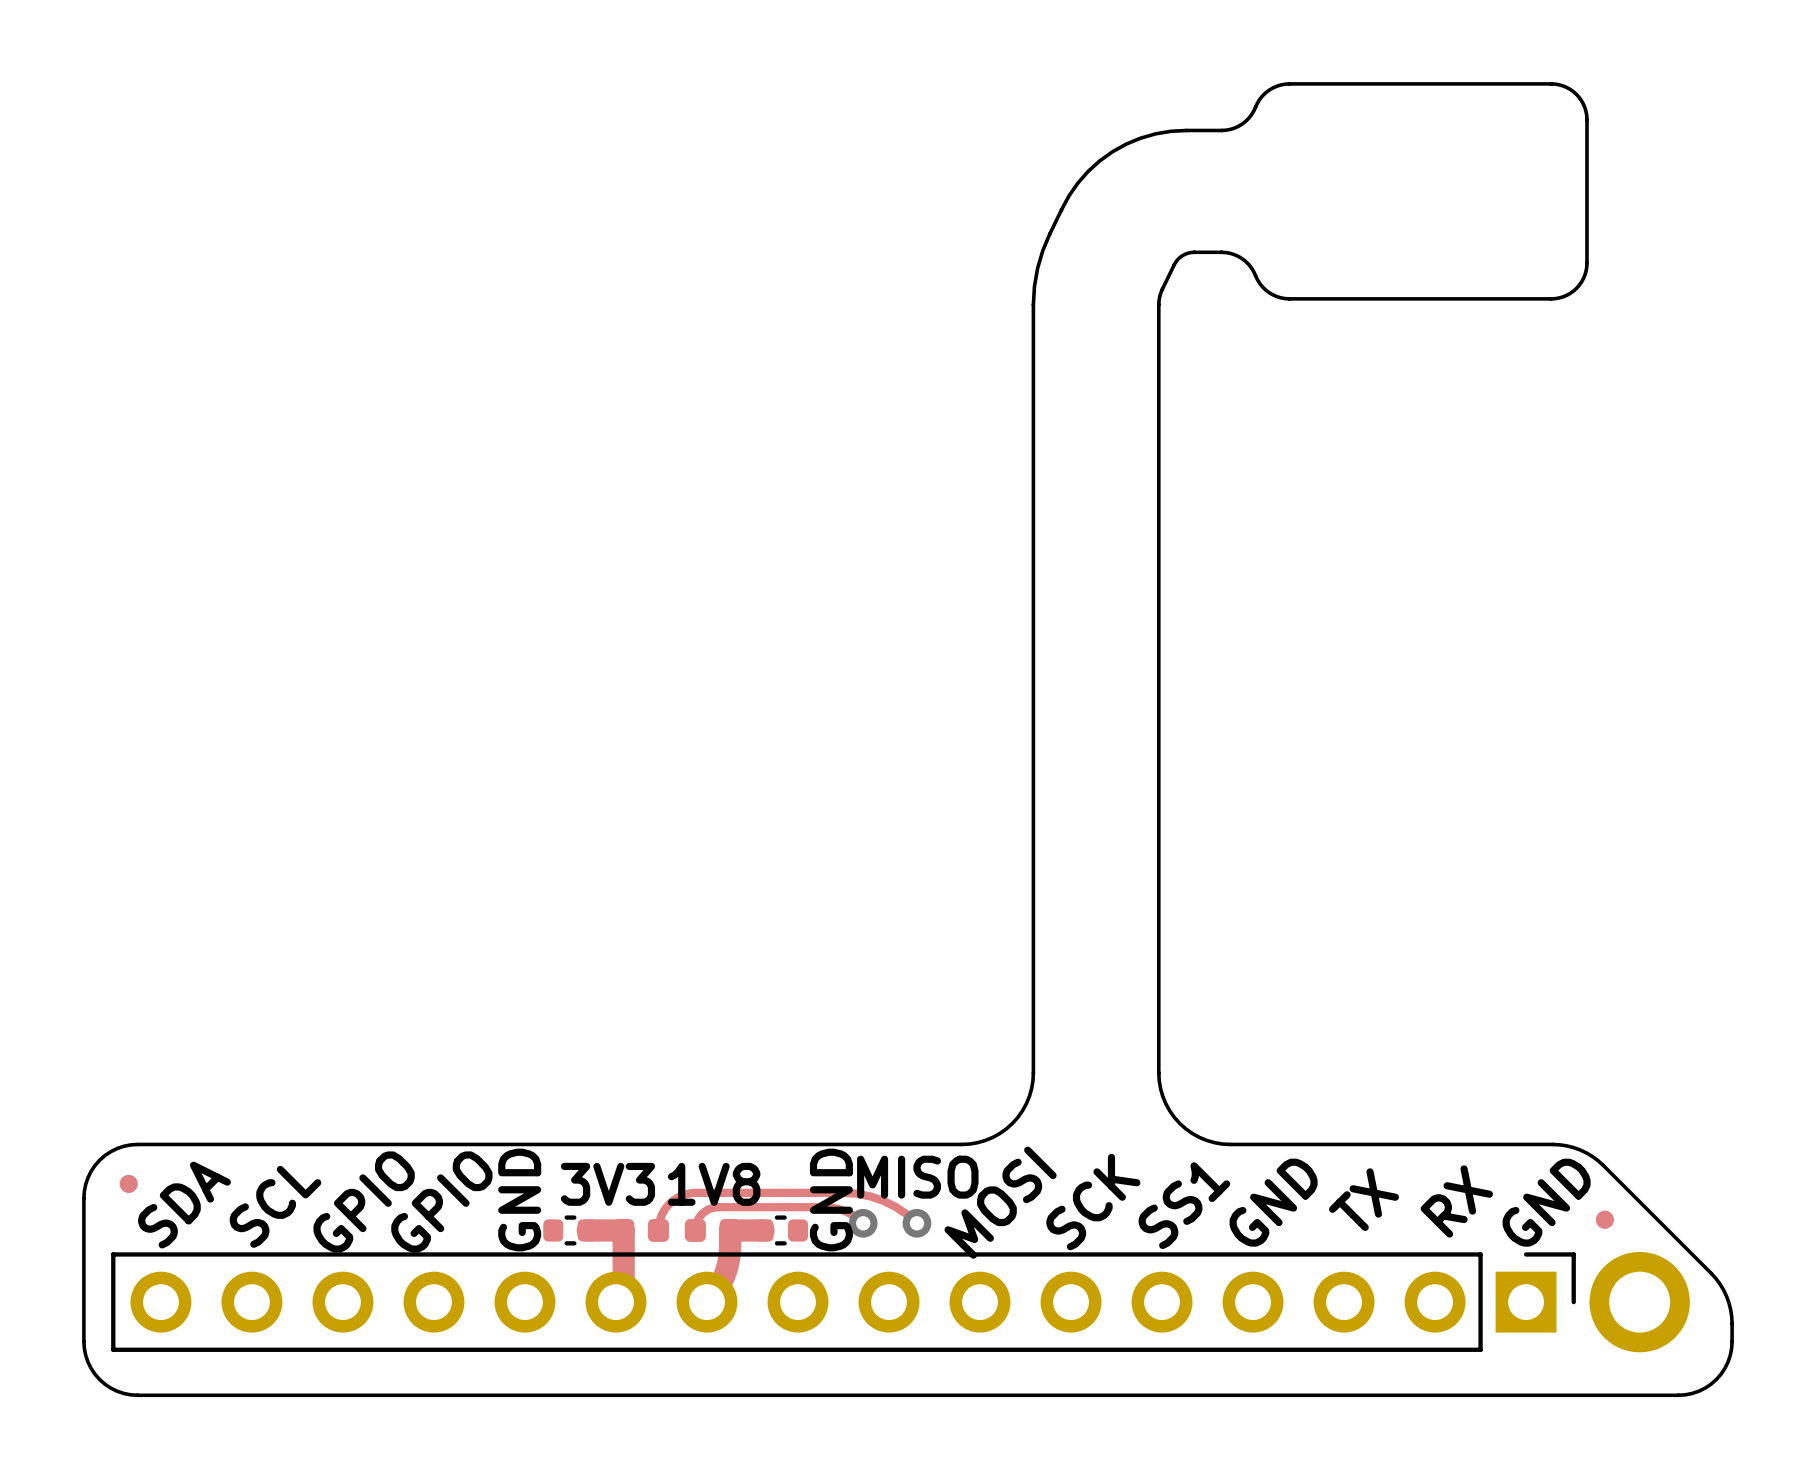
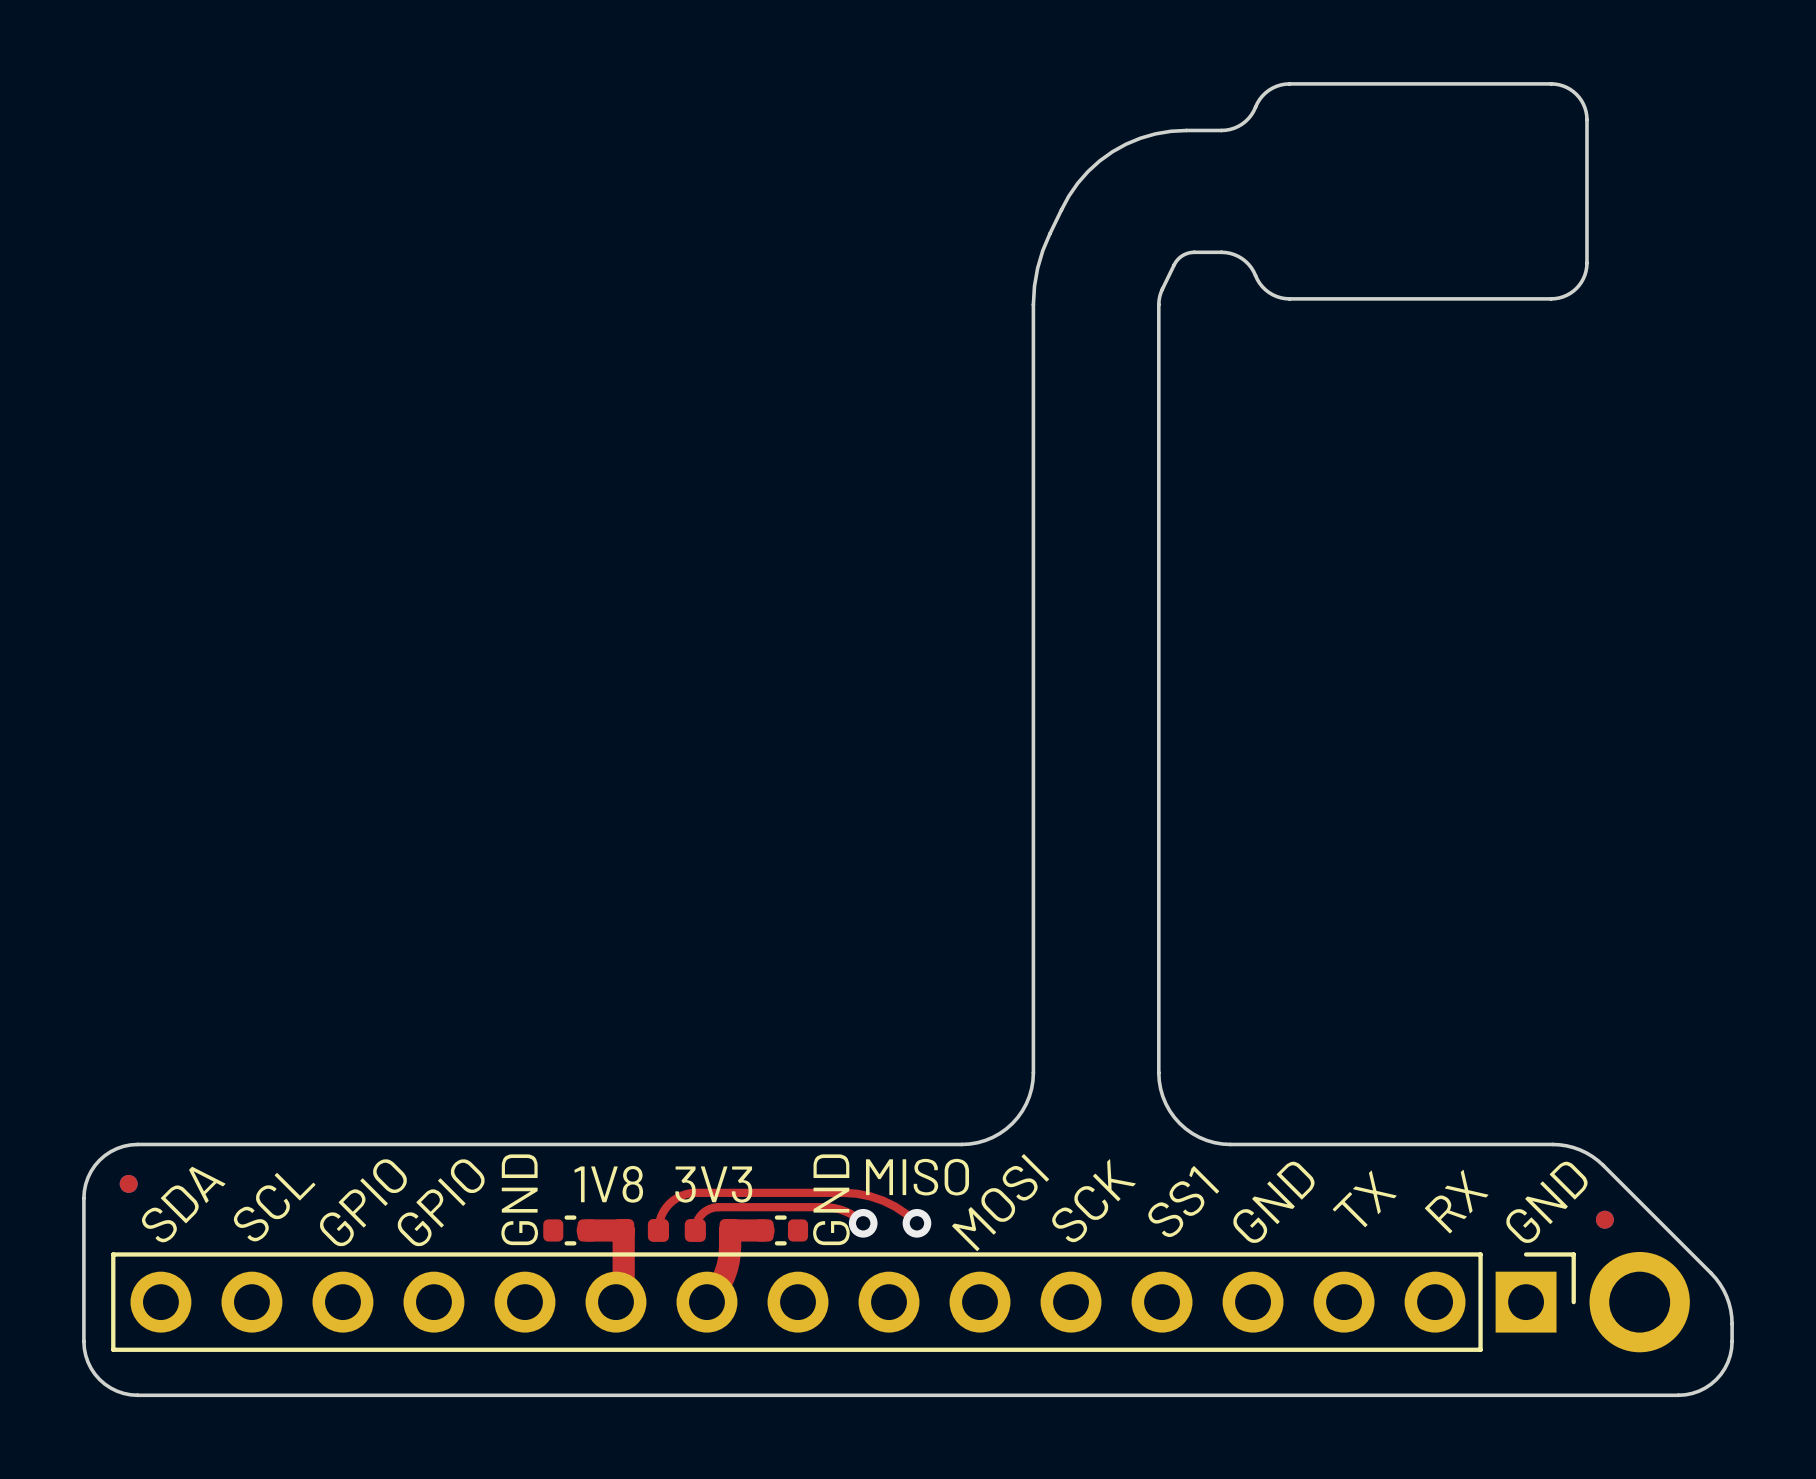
text: 3V3 (607, 1184) -> 1V8 (608, 1184)
text: 1V8 (714, 1184) -> 3V3 (713, 1184)

